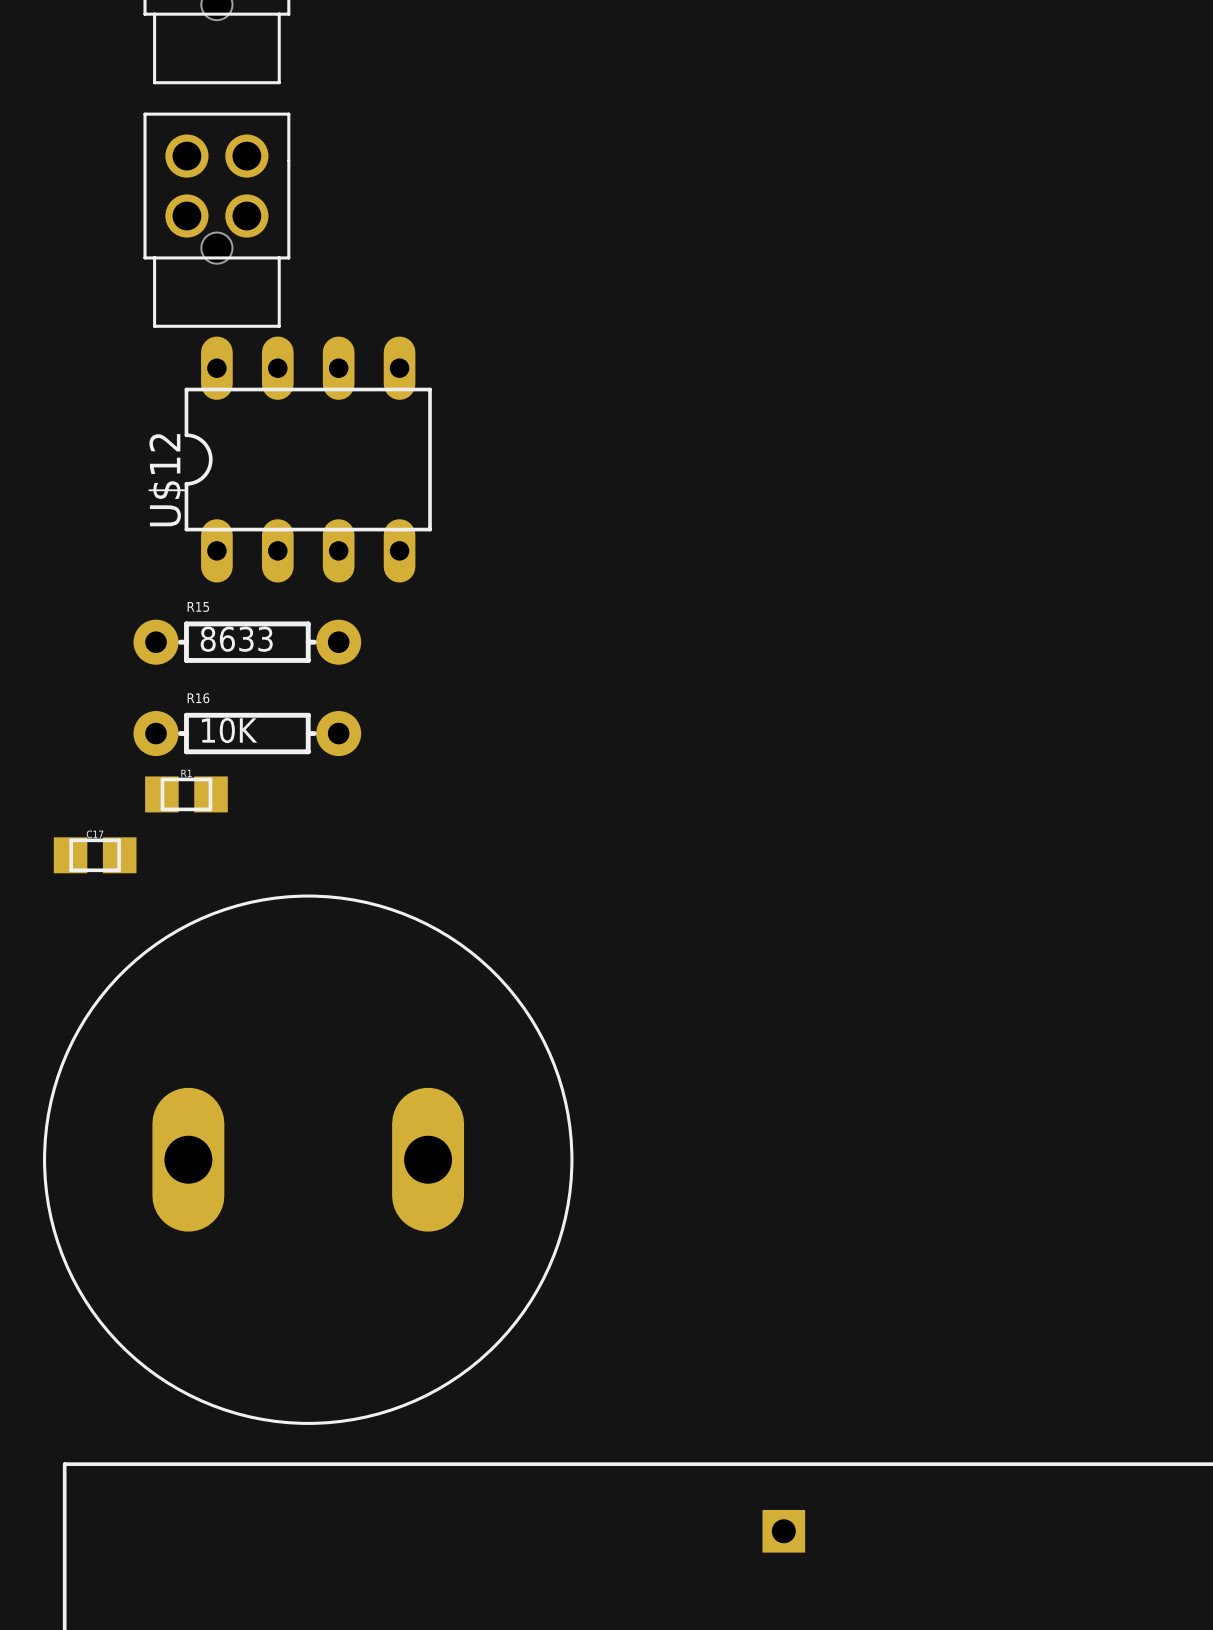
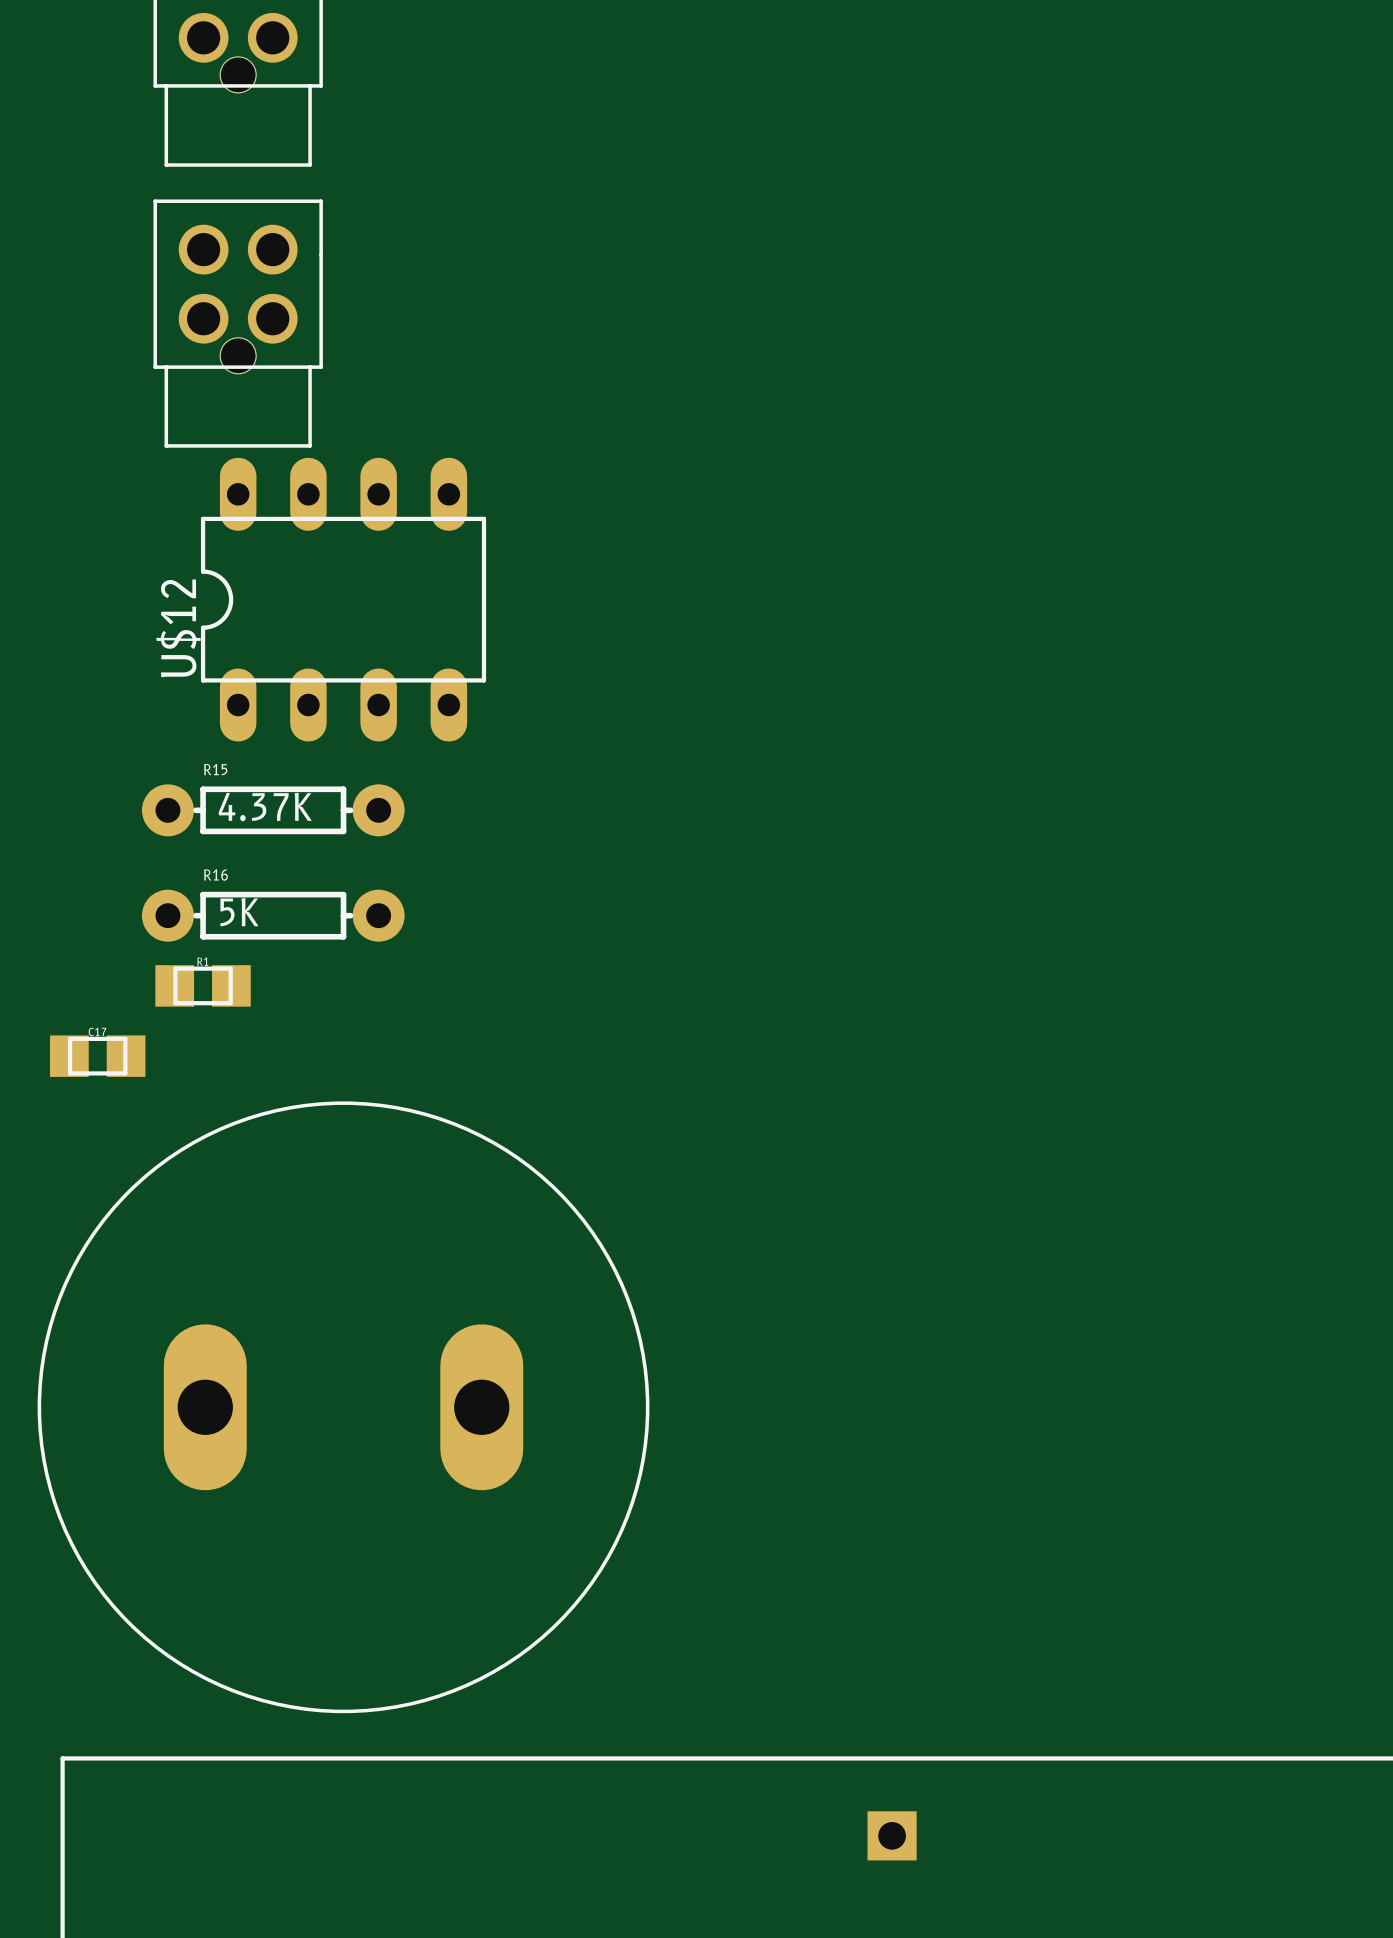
R15 value: 8633 (236, 639) -> 4.37K (265, 806)
R16 value: 10K (229, 730) -> 5K (239, 912)

